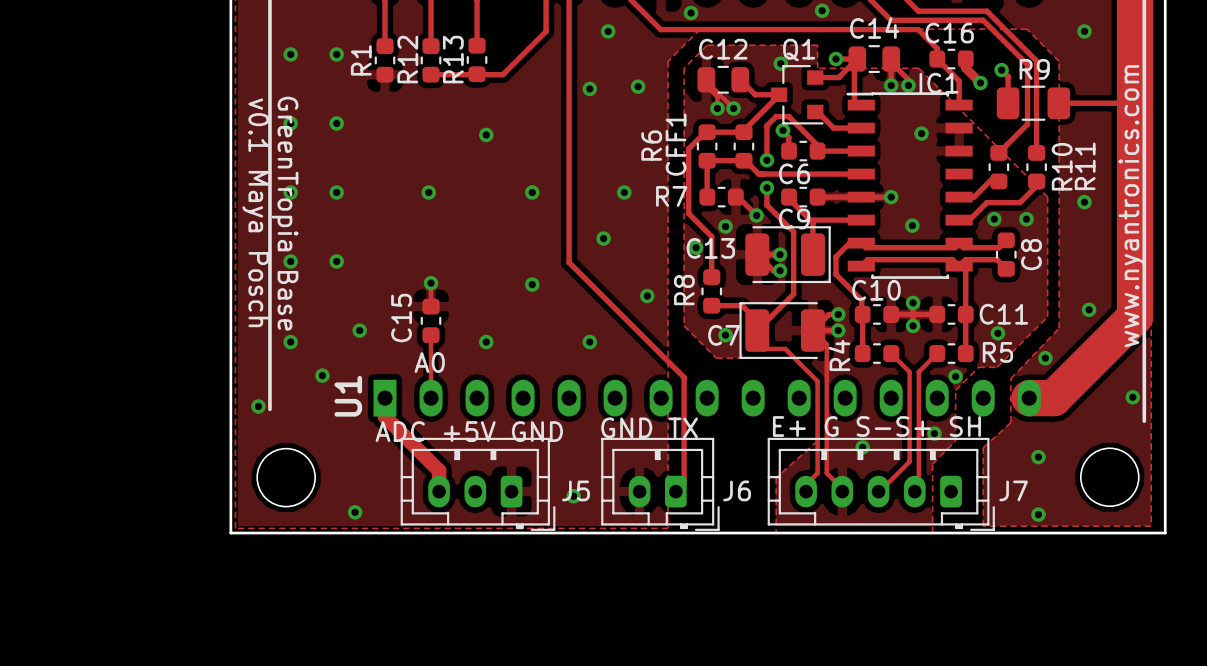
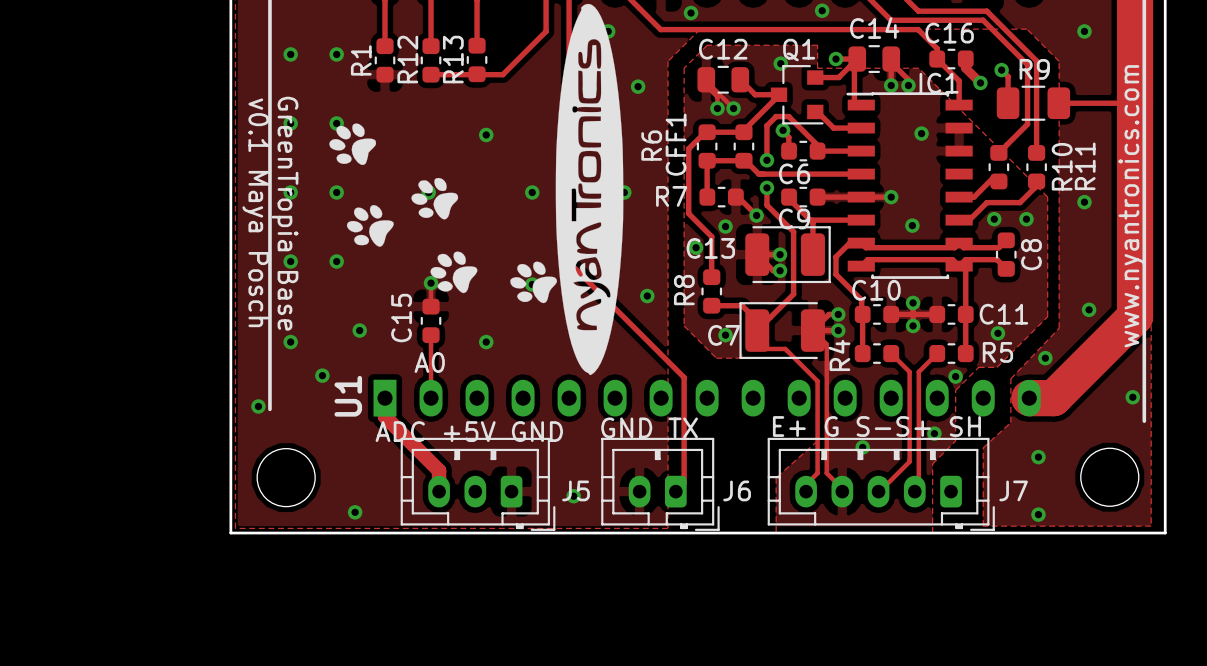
drawing: none -> [329, 3, 624, 376]

